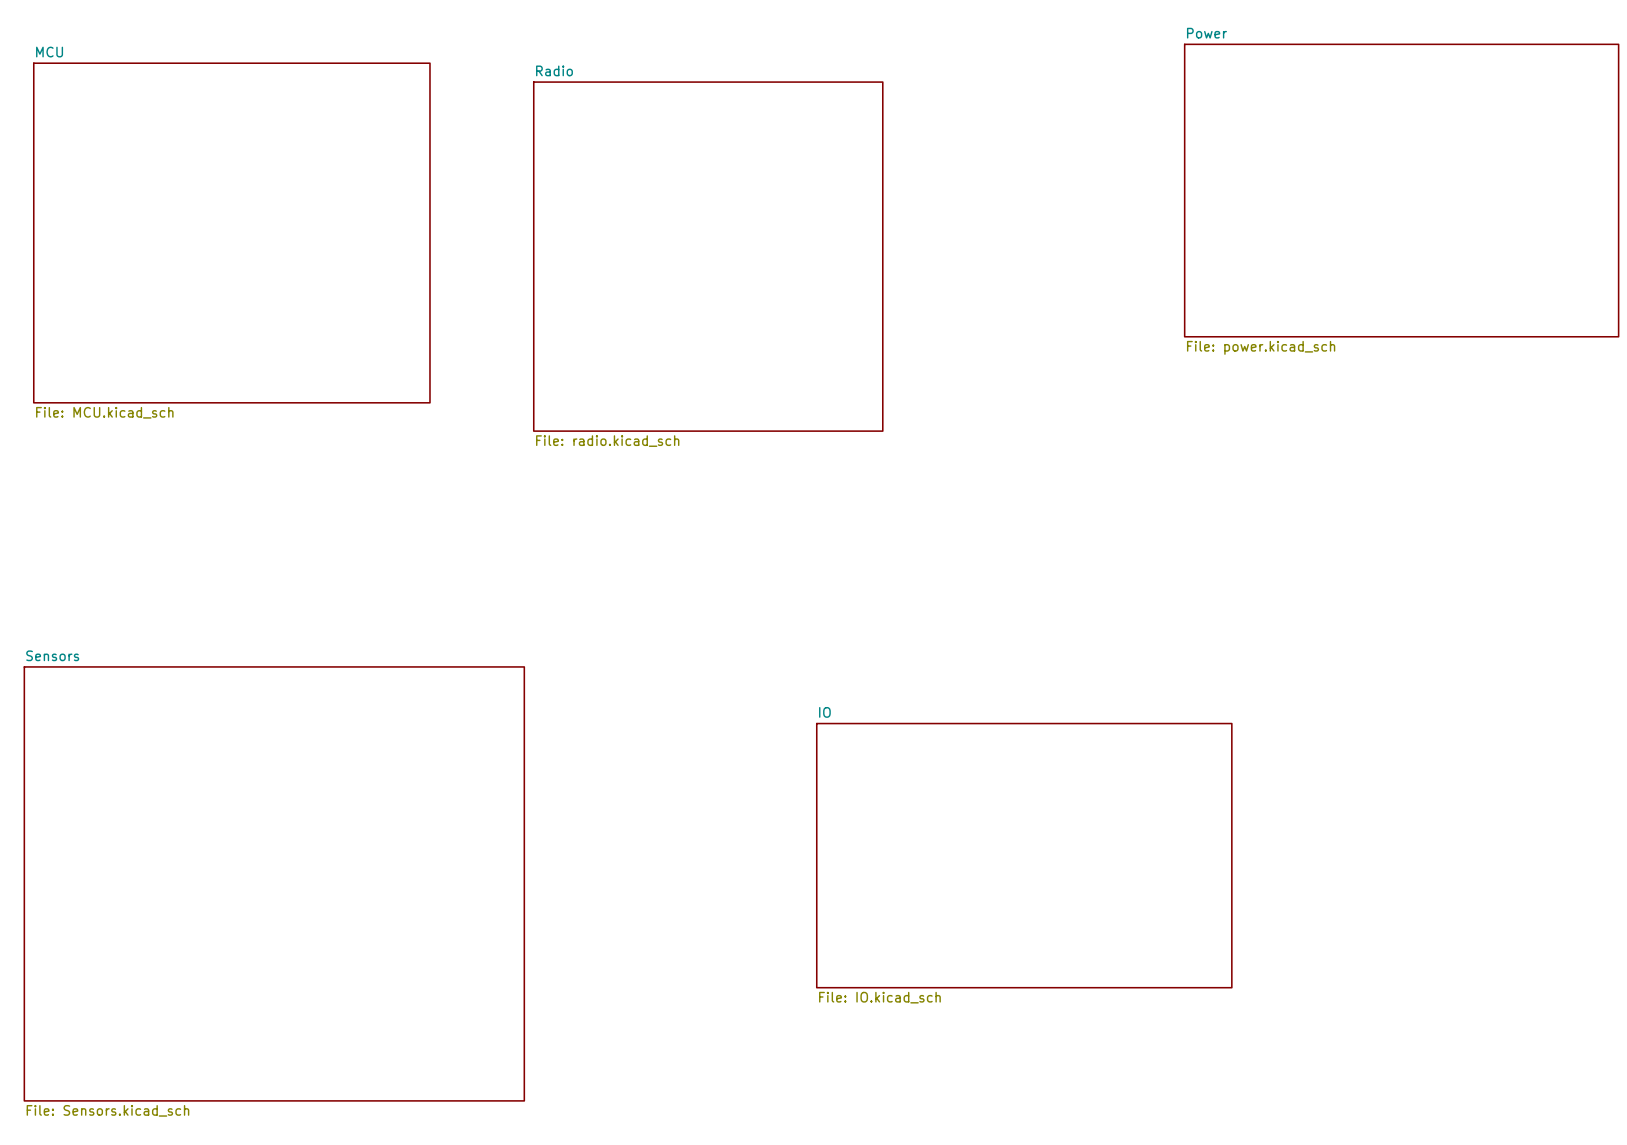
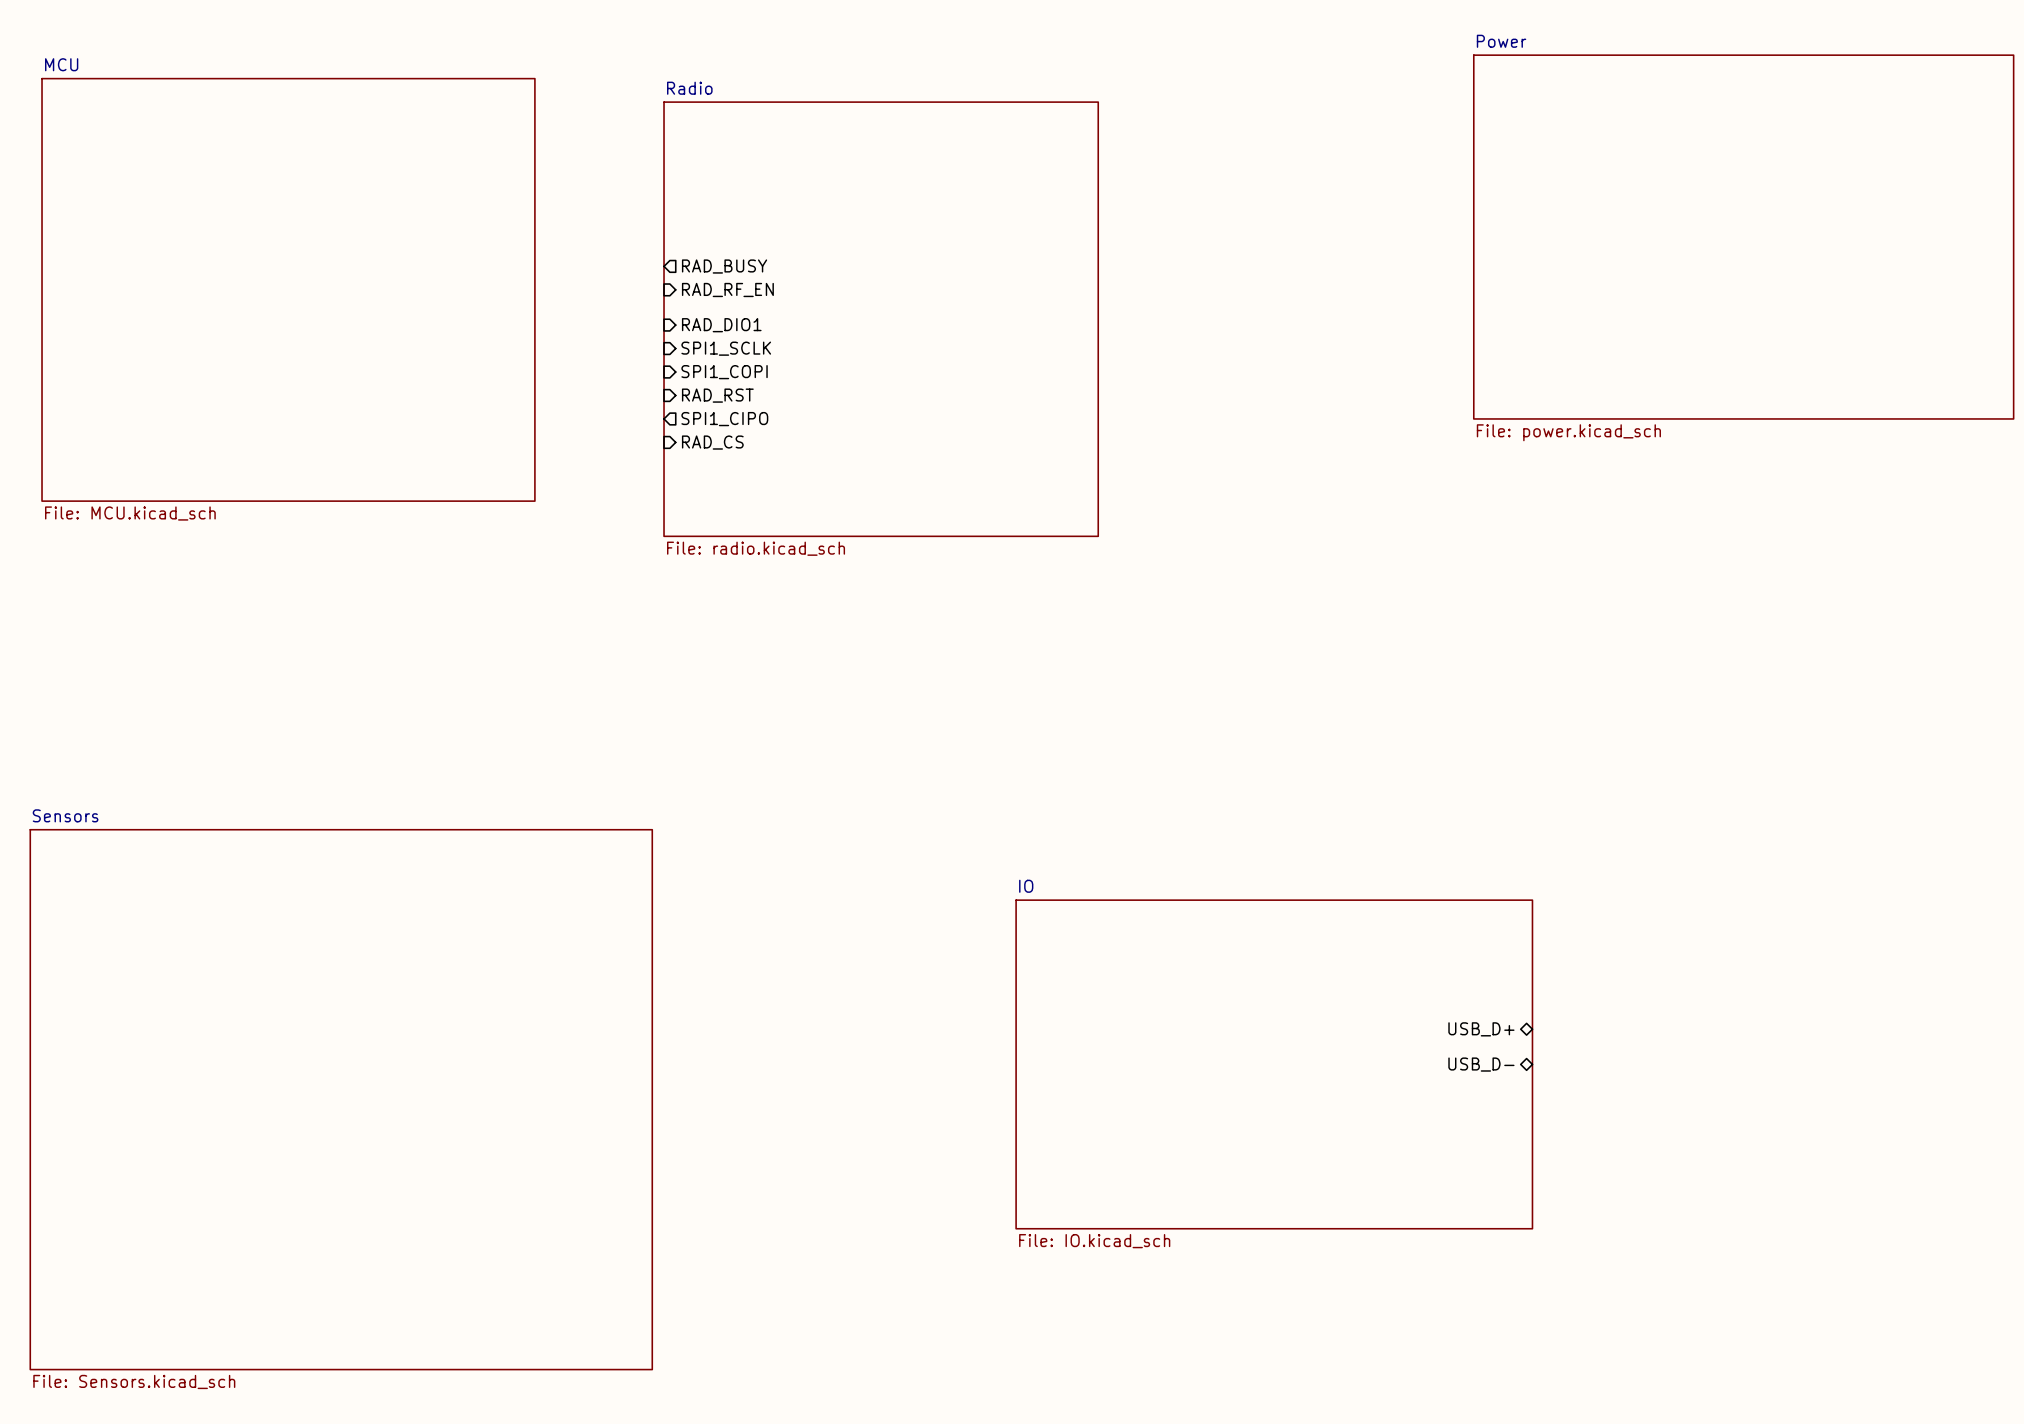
sheet pin: none -> RAD_BUSY (724, 266)
sheet pin: none -> RAD_RF_EN (727, 289)
sheet pin: none -> RAD_DIO1 (721, 325)
sheet pin: none -> SPI1_SCLK (726, 348)
sheet pin: none -> SPI1_COPI (724, 372)
sheet pin: none -> RAD_RST (717, 395)
sheet pin: none -> SPI1_CIPO (724, 419)
sheet pin: none -> RAD_CS (712, 442)
sheet pin: none -> USB_D+ (1481, 1029)
sheet pin: none -> USB_D- (1481, 1064)

